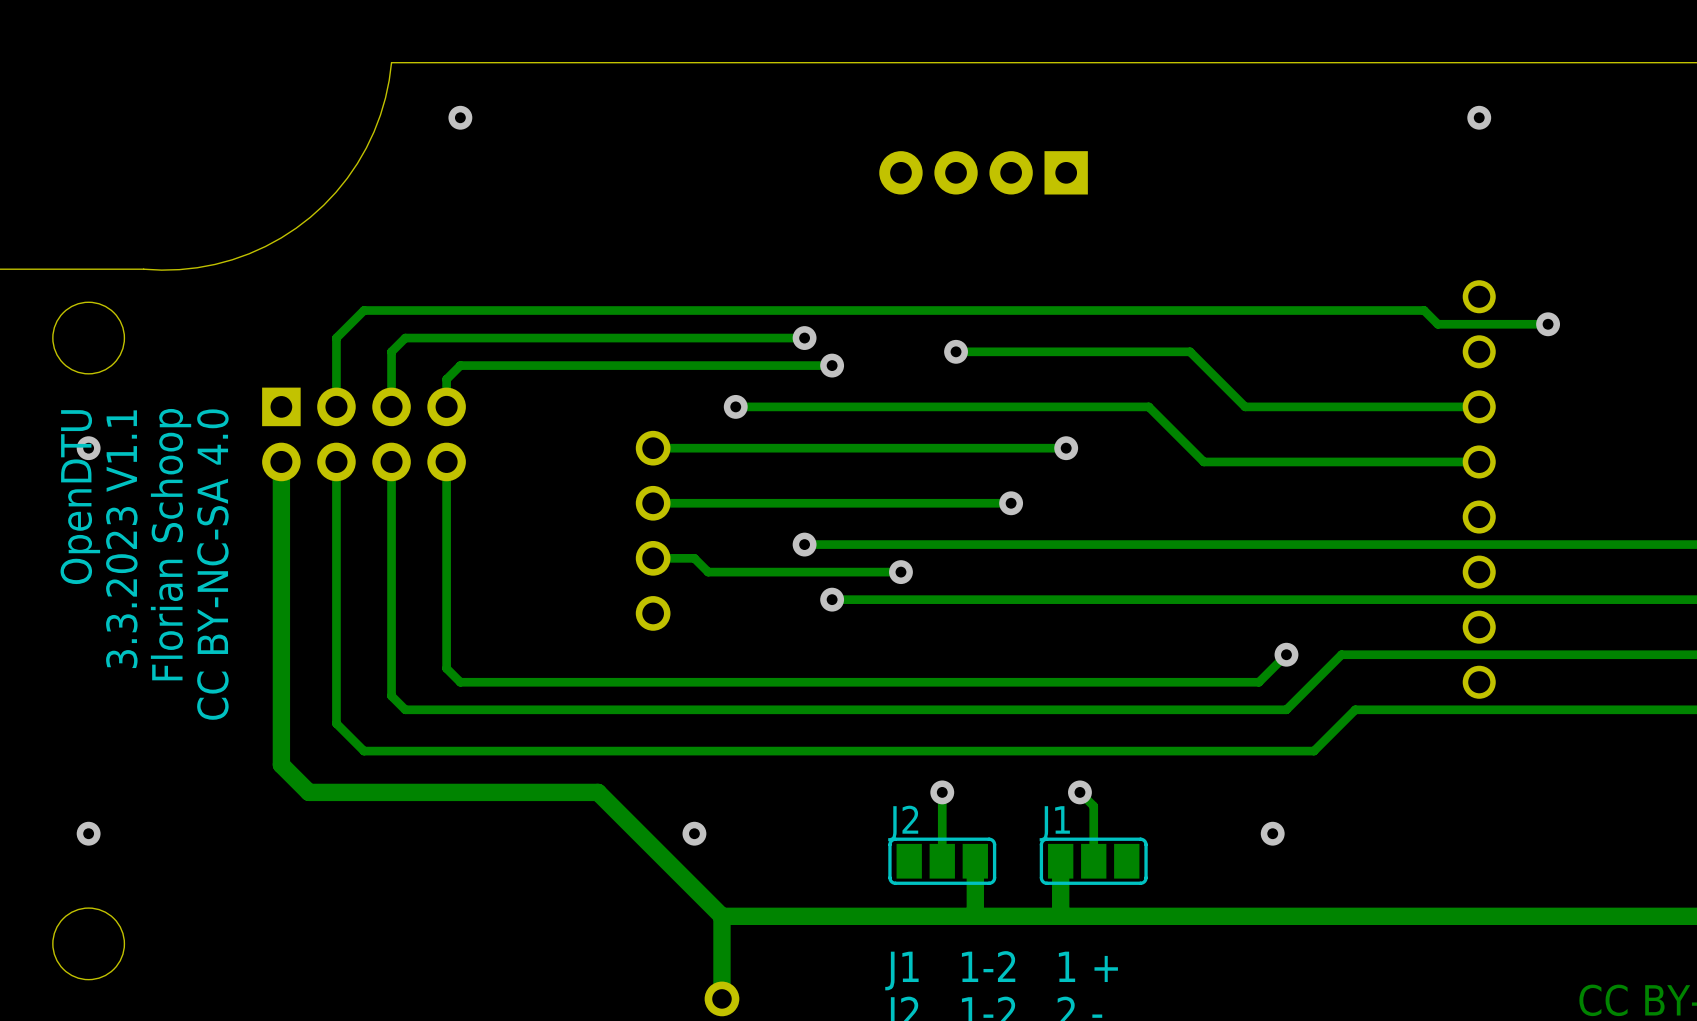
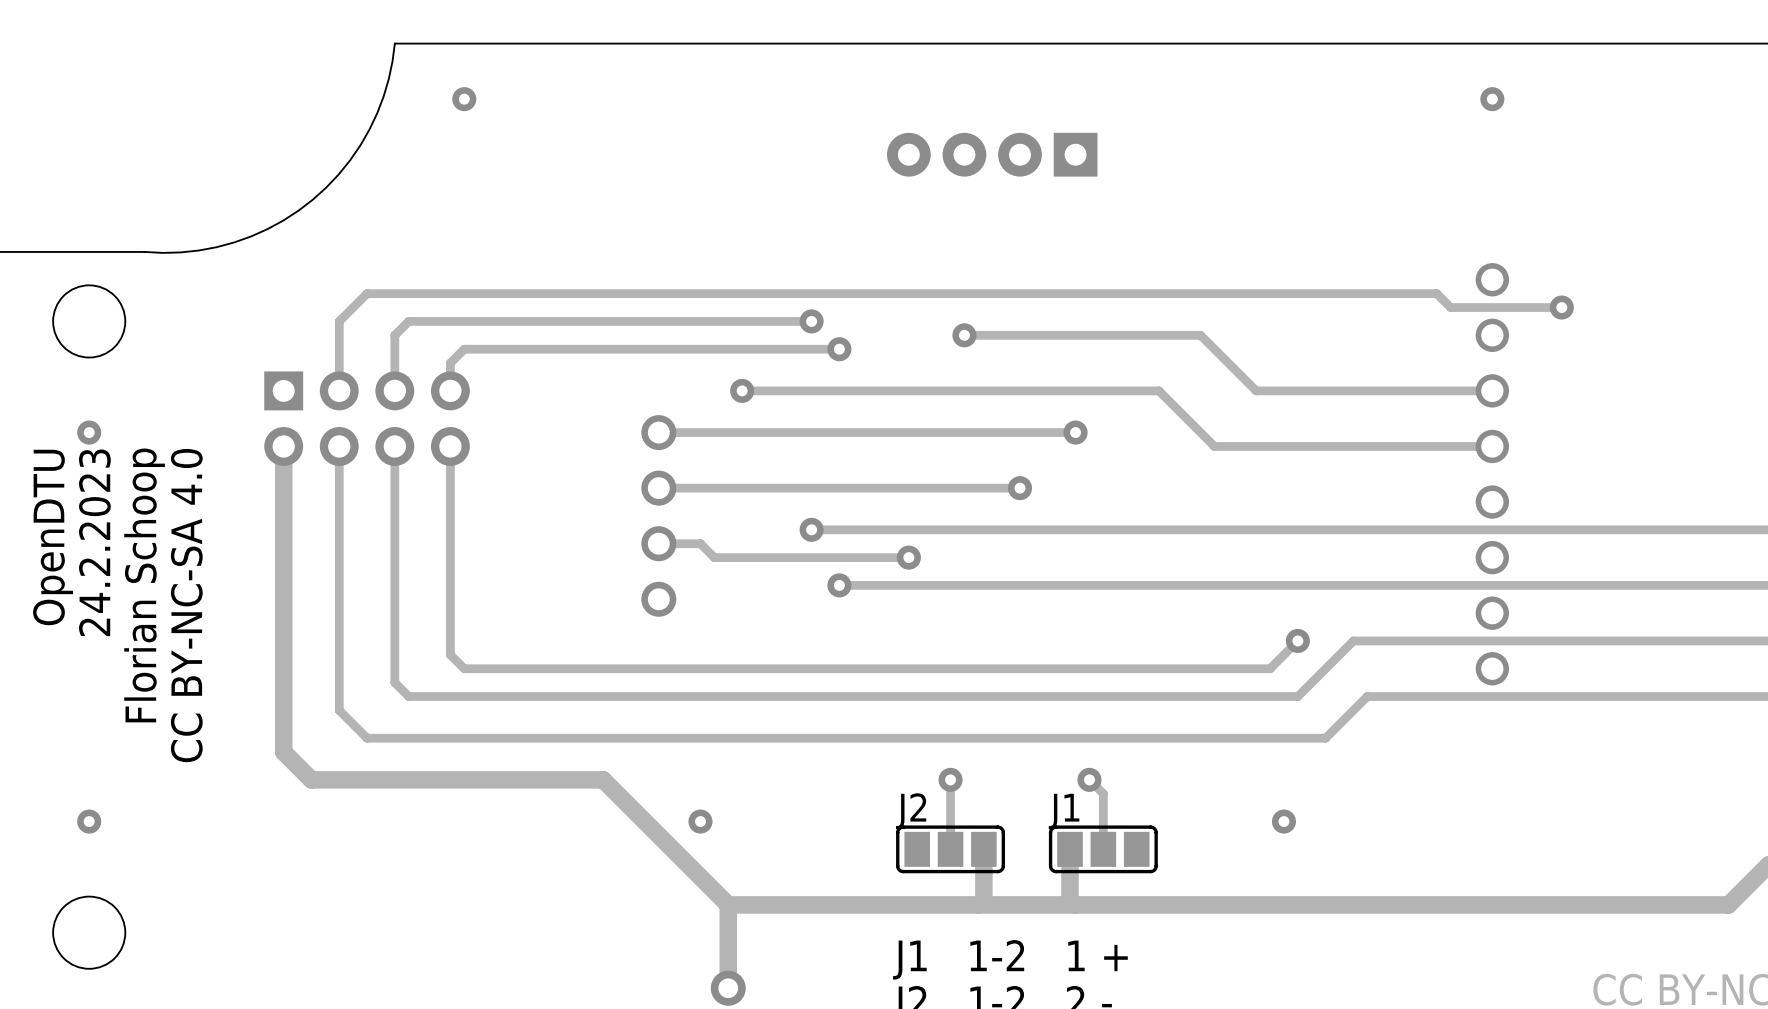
text position: OpenDTU (80, 497) -> OpenDTU (53, 537)
text: 3.3.2023 V1.1 (121, 539) -> none
text position: Florian Schoop (171, 544) -> Florian Schoop (144, 585)
text: none -> 24.2.2023 (94, 542)
text position: CC BY-NC-SA 4.0 (212, 564) -> CC BY-NC-SA 4.0 (186, 605)

